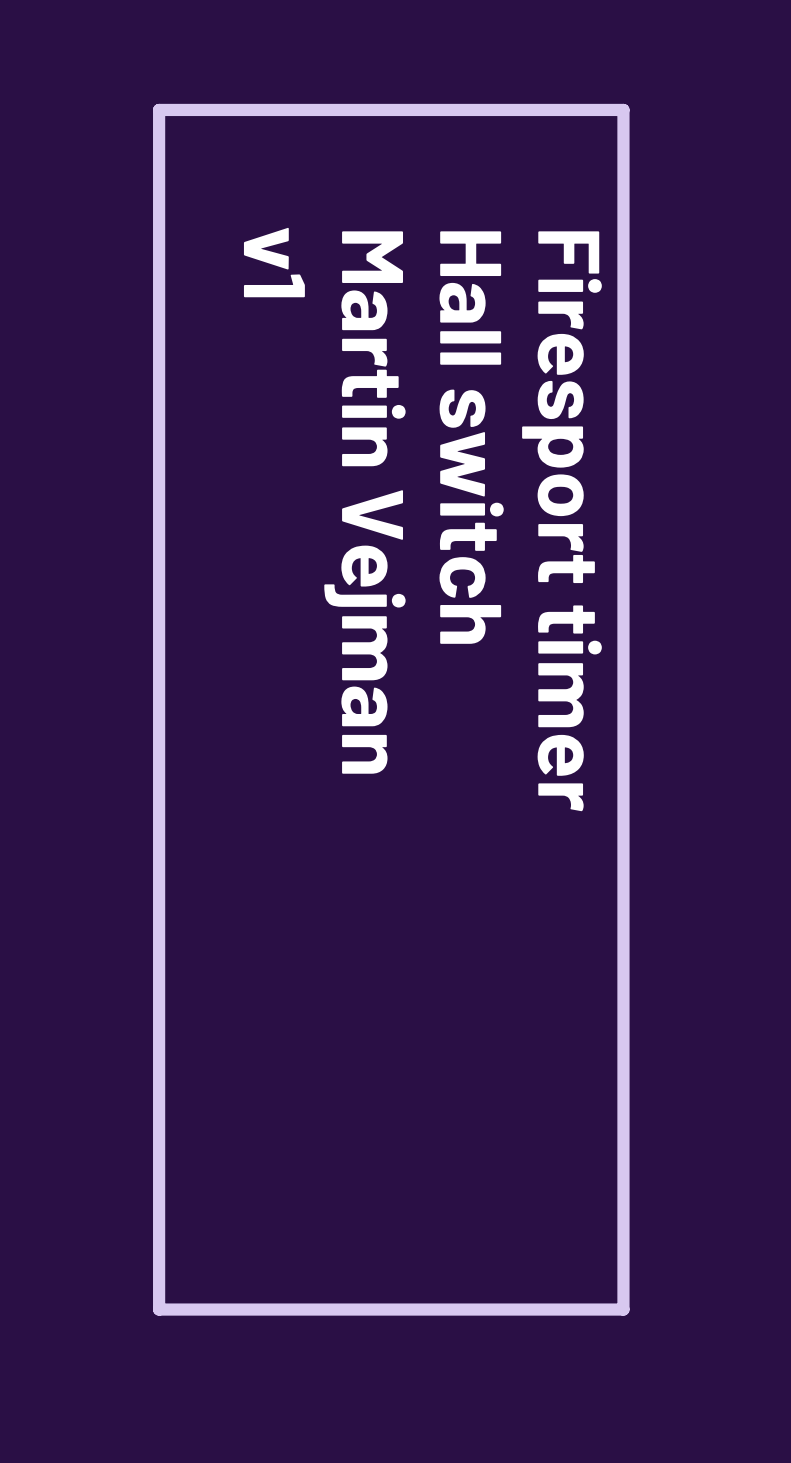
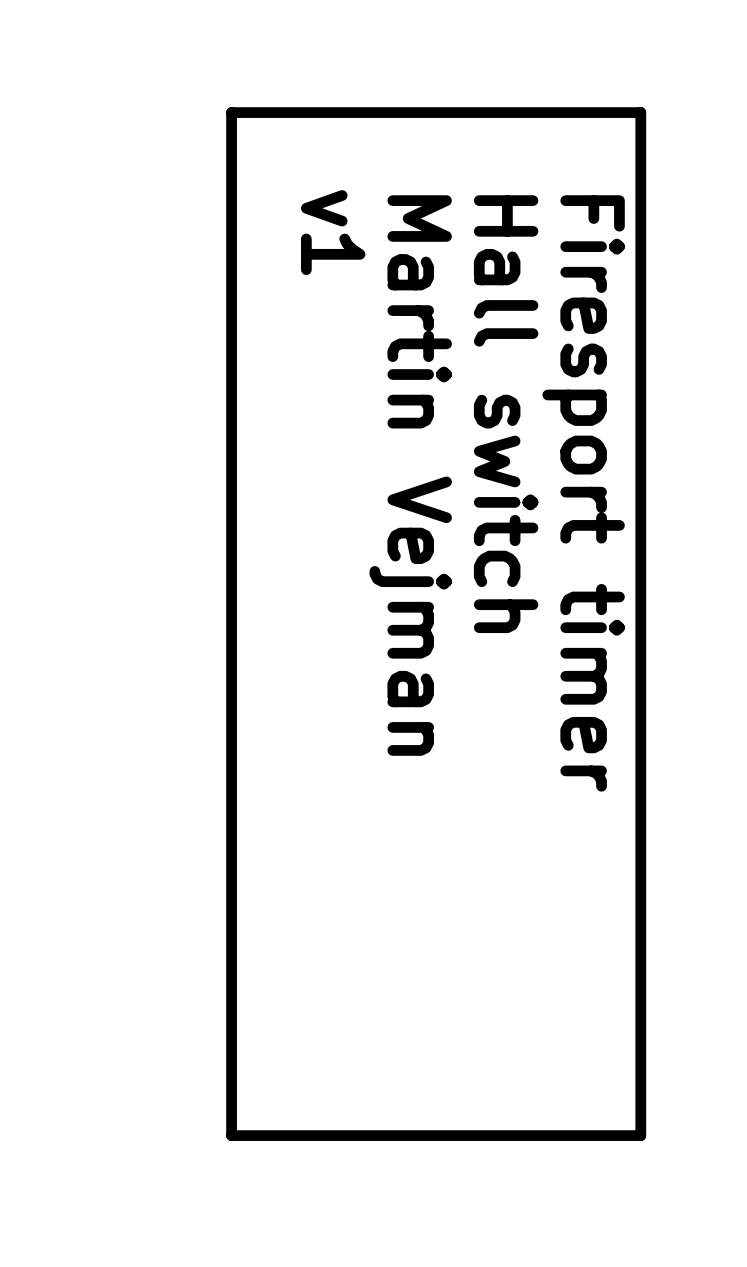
board edge: (623, 148) (623, 109) (159, 109) (159, 148) -> (640, 112) (231, 112)

